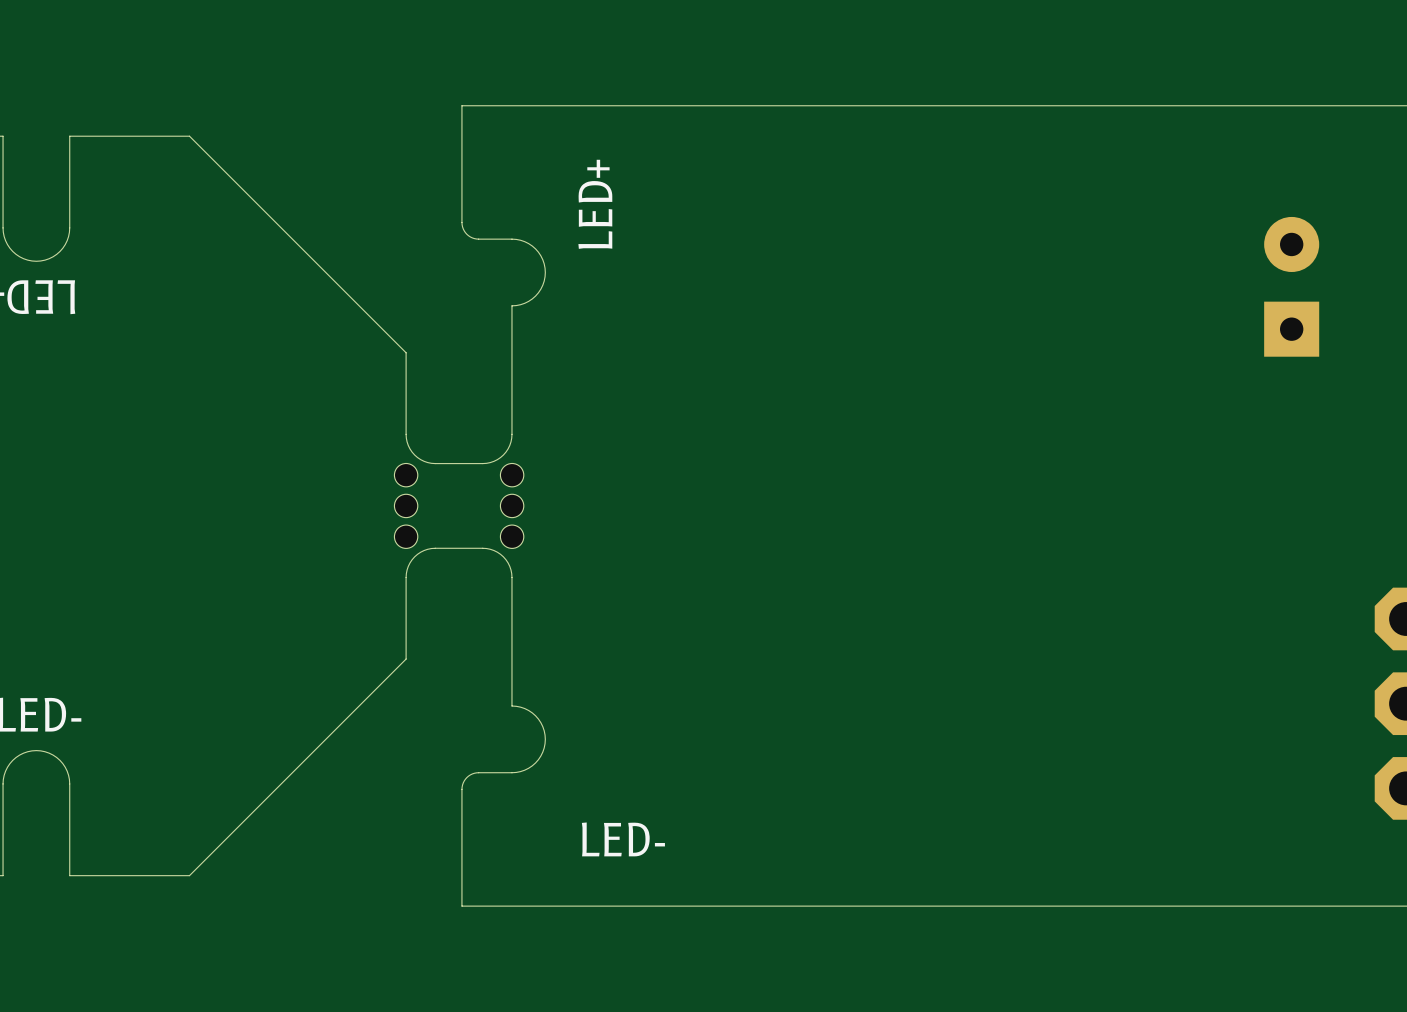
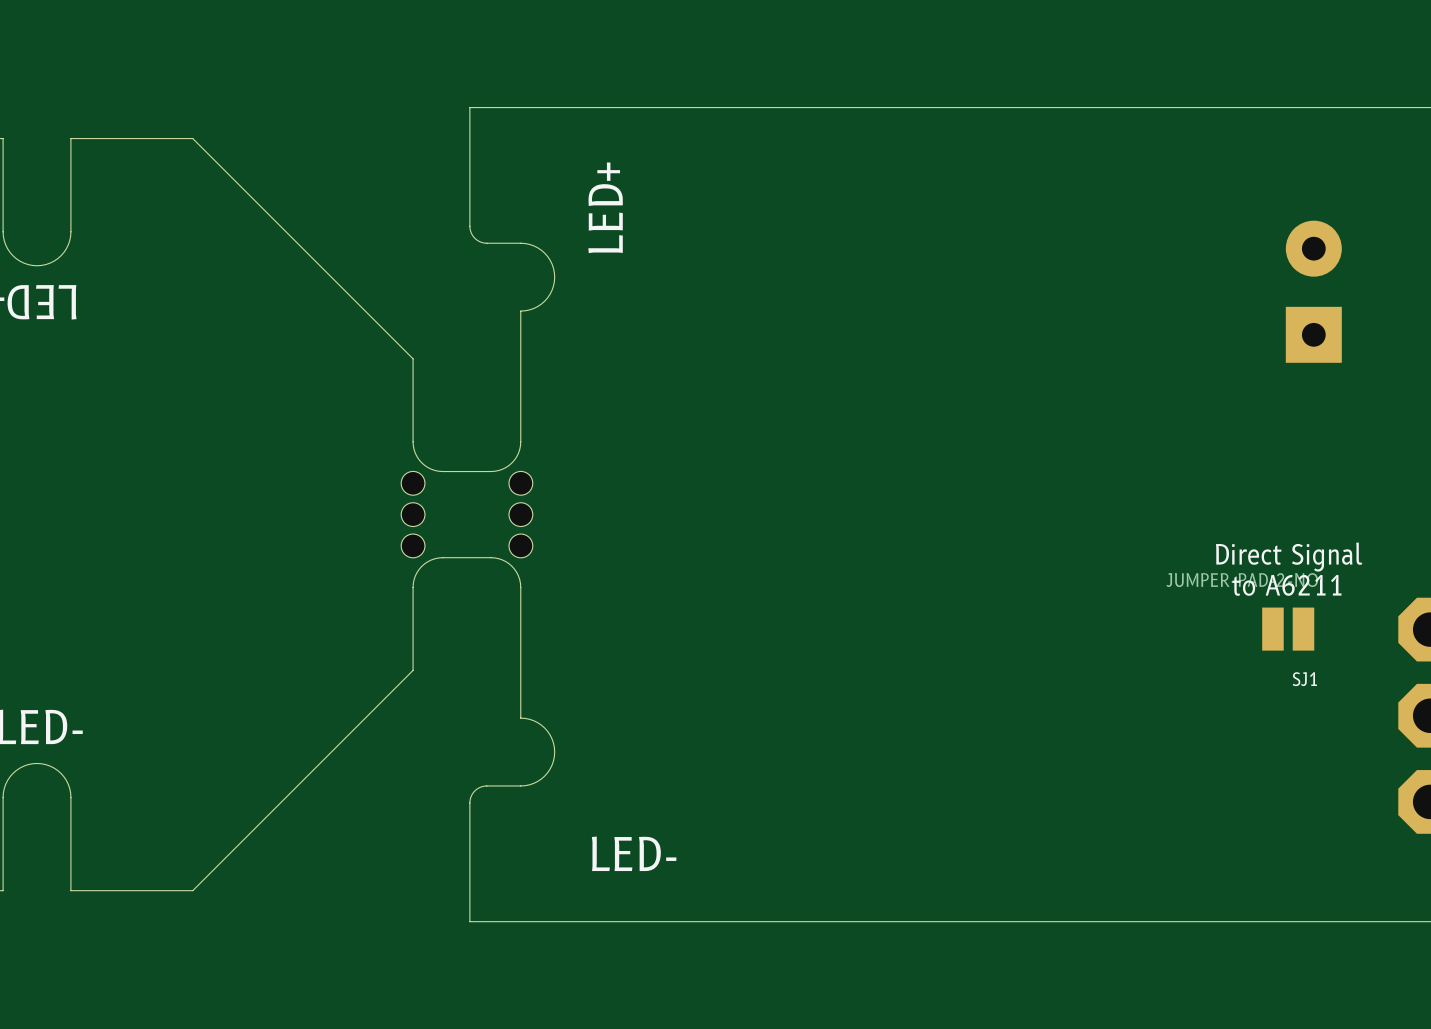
text: none -> Direct Signal (1289, 557)
text: none -> to A6211 (1286, 585)
SJ1: none -> JUMPER-PAD-2-NO (1288, 629)

